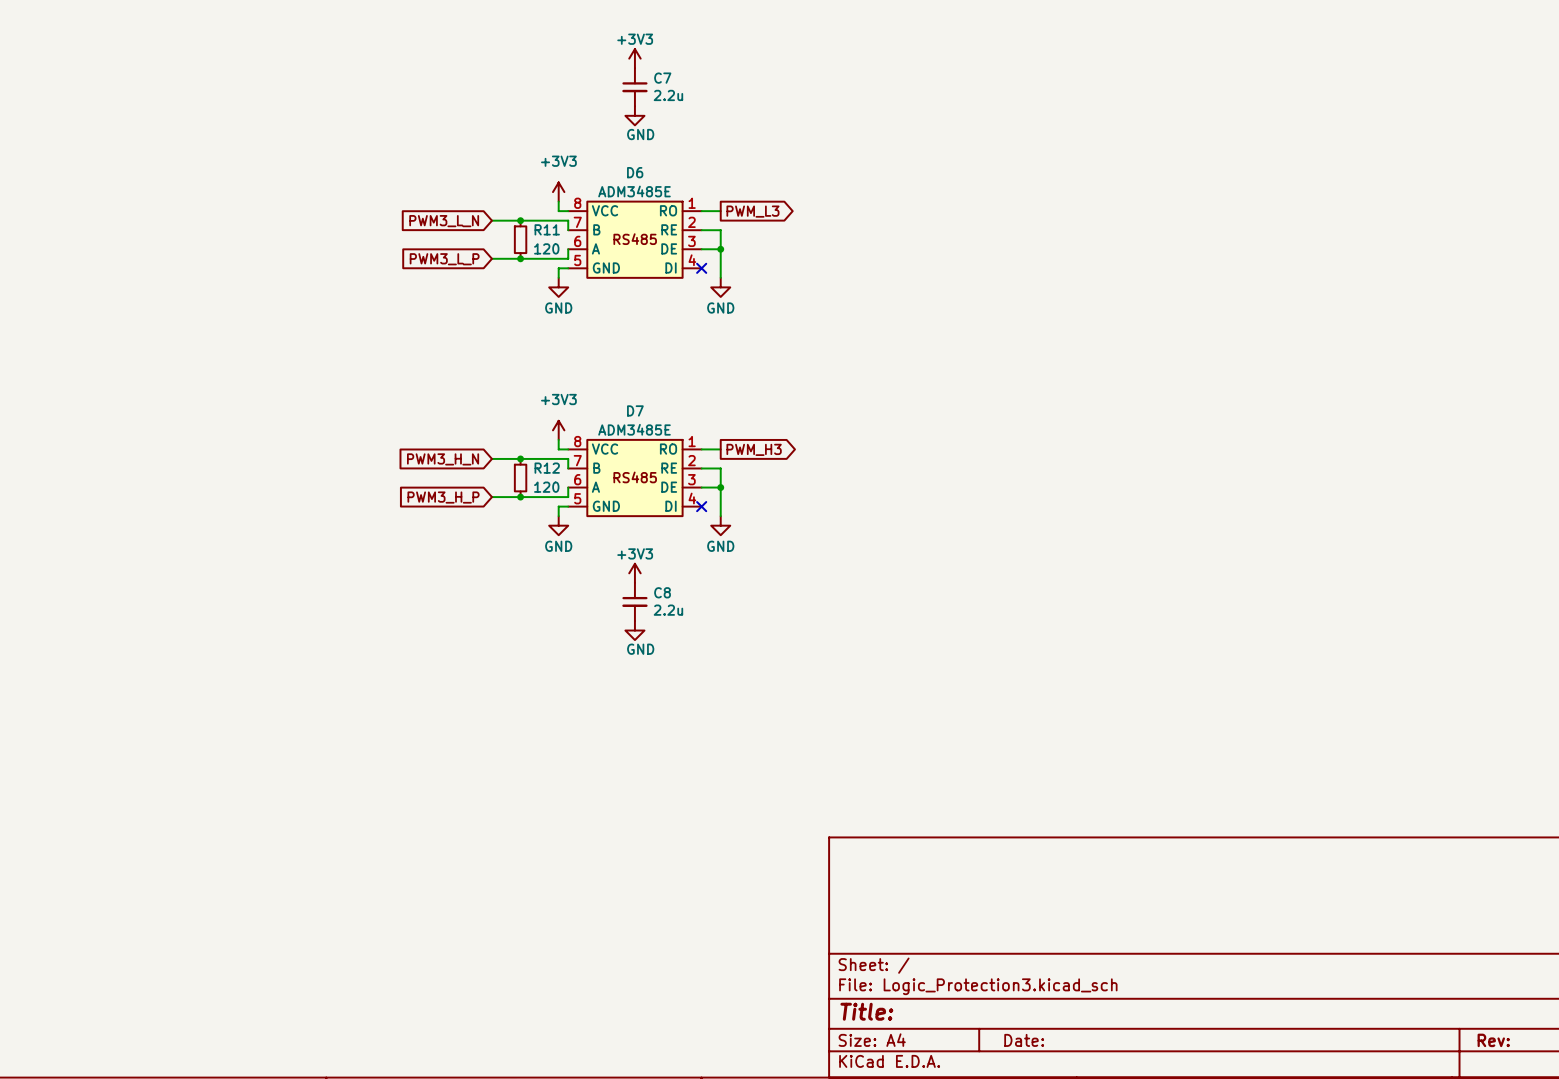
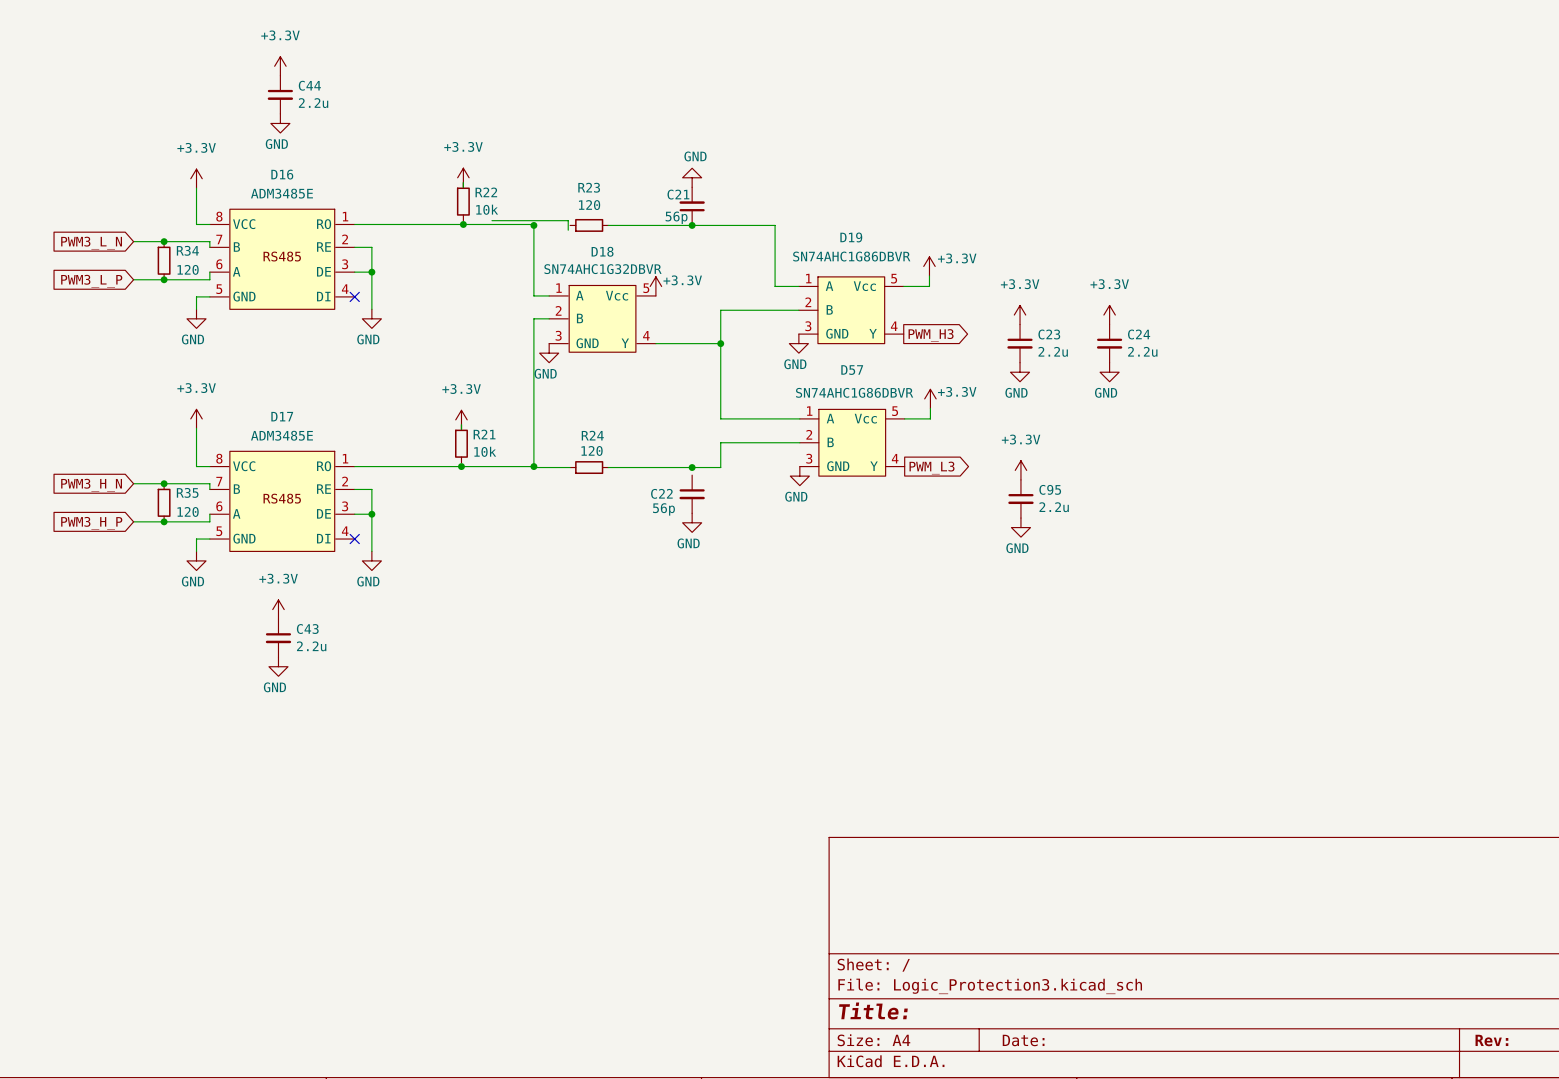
power symbol: +3V3 (634, 58) -> none
power symbol: none -> +3.3V (280, 66)
C7: 2.2u (634, 87) -> none
C44: none -> 2.2u (280, 94)
power symbol: GND (634, 115) -> none
power symbol: none -> GND (280, 123)
power symbol: none -> +3.3V (463, 177)
power symbol: none -> GND (692, 177)
power symbol: none -> +3.3V (196, 178)
wire: none -> (463, 182) (463, 187)
wire: none -> (196, 188) (196, 224) (209, 224)
power symbol: +3V3 (558, 192) -> none
R22: none -> 10k (463, 201)
wire: (558, 201) (558, 211) (568, 211) -> none
C21: none -> 56p (692, 206)
wire: (701, 211) (720, 211) -> none
global label: PWM_L3 (752, 211) -> none
junction position: (520, 220) -> (533, 225)
global label: PWM3_L_N (444, 221) -> none
wire: none -> (354, 224) (533, 224) (533, 295) (549, 295)
junction: none -> (463, 224)
R23: none -> 120 (589, 225)
wire: none -> (608, 225) (775, 225) (775, 286) (798, 286)
wire: (701, 230) (720, 230) (720, 277) -> none
R11: 120 (520, 239) -> none
D6: ADM3485E (634, 239) -> none
wire: none -> (133, 241) (209, 241) (209, 247)
junction: none -> (164, 241)
global label: none -> PWM3_L_N (91, 243)
wire: none -> (354, 247) (371, 247) (371, 309)
wire: (568, 249) (568, 258) (491, 258) -> none
wire: (701, 249) (720, 249) -> none
junction position: (720, 249) -> (692, 225)
junction: (520, 258) -> none
D16: none -> ADM3485E (282, 259)
global label: PWM3_L_P (444, 259) -> none
R34: none -> 120 (164, 260)
power symbol: none -> +3.3V (929, 266)
wire: (568, 268) (558, 268) (558, 277) -> none
no-connect mark: (701, 268) -> none
wire: none -> (209, 272) (209, 279) (133, 279)
wire: none -> (354, 272) (371, 272)
junction: none -> (371, 272)
wire: none -> (929, 275) (929, 286) (903, 286)
junction: none -> (164, 279)
global label: none -> PWM3_L_P (91, 281)
power symbol: none -> +3.3V (655, 286)
power symbol position: GND (558, 287) -> GND (549, 353)
power symbol: GND (720, 287) -> none
wire: none -> (209, 296) (196, 296) (196, 309)
no-connect mark: none -> (354, 296)
wire: none -> (798, 310) (720, 310) (720, 418) (799, 418)
D19: none -> SN74AHC1G86DBVR (851, 310)
power symbol: none -> +3.3V (1020, 315)
power symbol: none -> +3.3V (1109, 315)
power symbol: none -> GND (196, 318)
power symbol: none -> GND (371, 318)
wire: none -> (549, 318) (533, 318) (533, 467) (570, 467)
D18: none -> SN74AHC1G32DBVR (602, 318)
global label: none -> PWM_H3 (931, 335)
wire: none -> (655, 343) (720, 343)
junction: none -> (720, 343)
power symbol: none -> GND (798, 343)
C23: none -> 2.2u (1020, 343)
C24: none -> 2.2u (1109, 343)
power symbol: none -> GND (1020, 372)
power symbol: none -> GND (1109, 372)
power symbol: none -> +3.3V (930, 398)
wire: none -> (930, 408) (930, 418) (904, 418)
power symbol: none -> +3.3V (196, 418)
power symbol: none -> +3.3V (461, 419)
wire: none -> (461, 424) (461, 429)
wire: none -> (196, 428) (196, 466) (209, 466)
power symbol: +3V3 (558, 430) -> none
wire: (558, 439) (558, 449) (568, 449) -> none
wire: none -> (799, 442) (720, 442) (720, 467) (608, 467)
D57: none -> SN74AHC1G86DBVR (852, 442)
R21: none -> 10k (461, 443)
wire: (701, 449) (720, 449) -> none
global label: PWM_H3 (754, 449) -> none
wire: (491, 458) (568, 458) (568, 468) -> none
junction position: (520, 458) -> (533, 466)
global label: PWM3_H_N (443, 459) -> none
wire: none -> (354, 466) (533, 466)
junction: none -> (461, 466)
R24: none -> 120 (589, 467)
global label: none -> PWM_L3 (932, 468)
wire: (701, 468) (720, 468) (720, 516) -> none
power symbol: none -> +3.3V (1020, 470)
power symbol: none -> GND (799, 476)
R12: 120 (520, 478) -> none
D7: ADM3485E (634, 478) -> none
wire: none -> (133, 483) (209, 483) (209, 489)
junction: none -> (164, 483)
global label: none -> PWM3_H_N (91, 485)
wire: (568, 487) (568, 497) (491, 497) -> none
wire: (701, 487) (720, 487) -> none
junction position: (720, 487) -> (692, 467)
wire: none -> (354, 489) (371, 489) (371, 551)
C22: none -> 56p (692, 494)
global label: PWM3_H_P (443, 497) -> none
junction: (520, 497) -> none
C95: none -> 2.2u (1020, 498)
D17: none -> ADM3485E (282, 501)
R35: none -> 120 (164, 502)
wire: (568, 506) (558, 506) (558, 516) -> none
no-connect mark: (701, 506) -> none
wire: none -> (209, 514) (209, 521) (133, 521)
wire: none -> (354, 514) (371, 514)
junction: none -> (371, 514)
junction: none -> (164, 521)
global label: none -> PWM3_H_P (91, 523)
power symbol: GND (558, 525) -> none
power symbol position: GND (720, 525) -> GND (692, 522)
power symbol: none -> GND (1020, 527)
wire: none -> (209, 539) (196, 539) (196, 551)
no-connect mark: none -> (354, 539)
power symbol: none -> GND (196, 560)
power symbol: none -> GND (371, 560)
power symbol: +3V3 (634, 573) -> none
C8: 2.2u (634, 601) -> none
power symbol: none -> +3.3V (278, 609)
power symbol: GND (634, 630) -> none
C43: none -> 2.2u (278, 638)
power symbol: none -> GND (278, 666)

